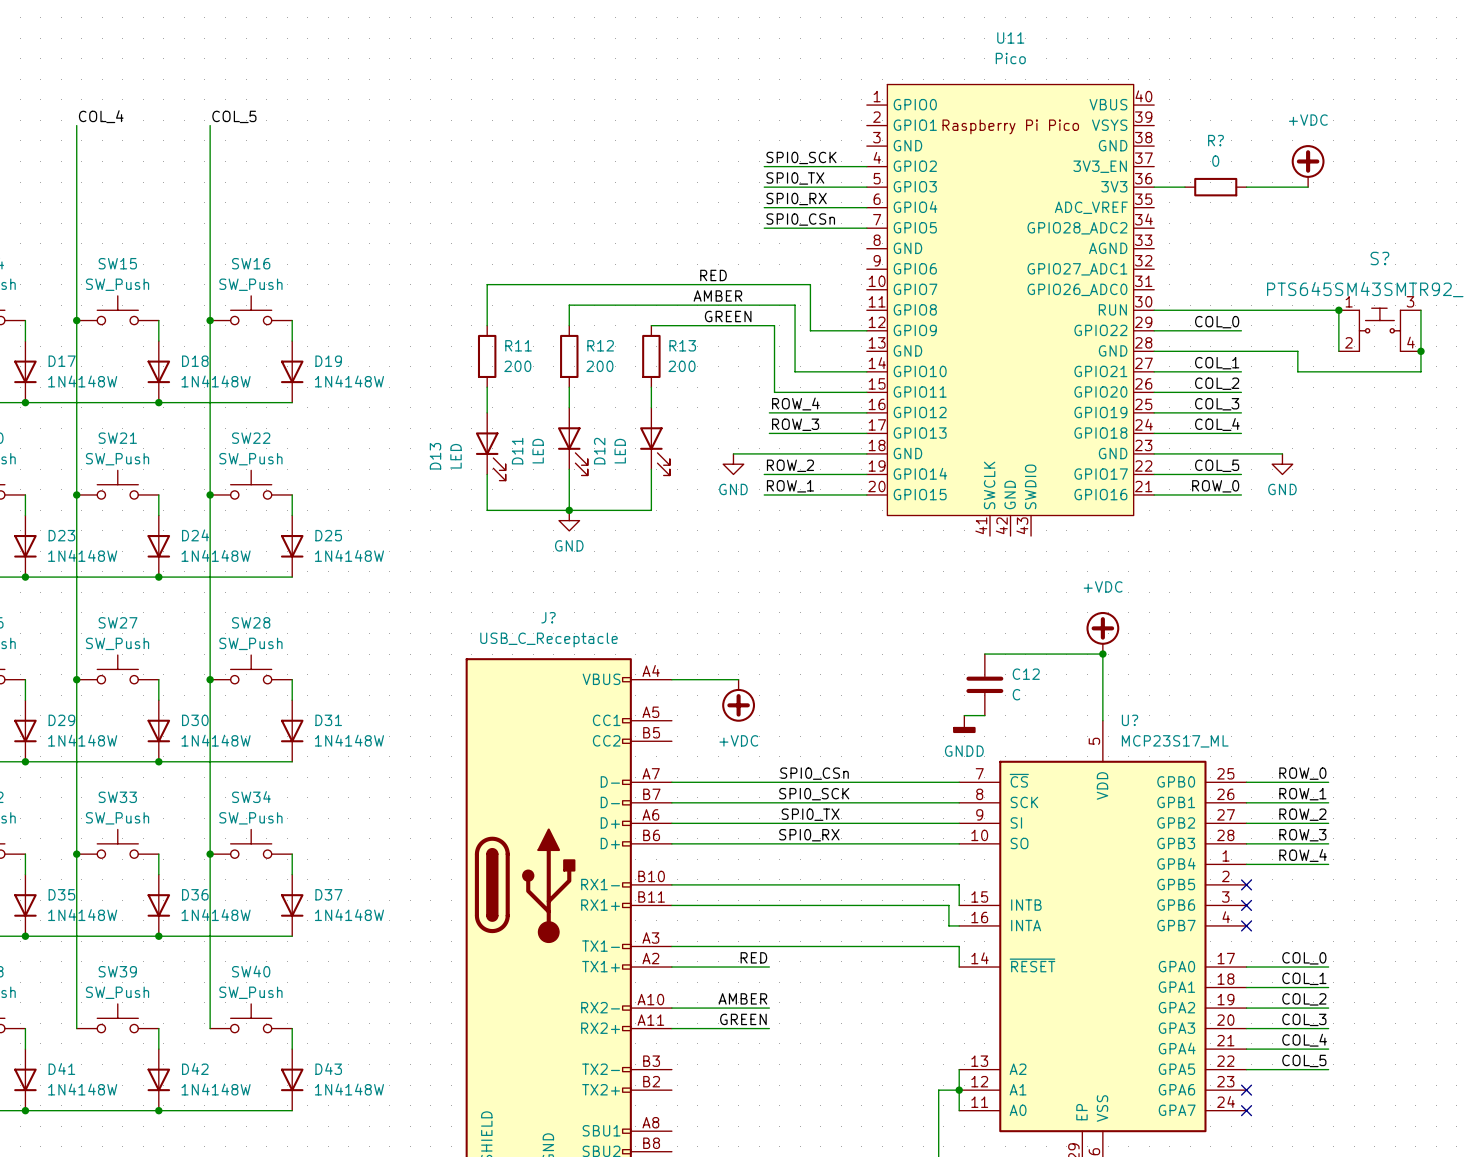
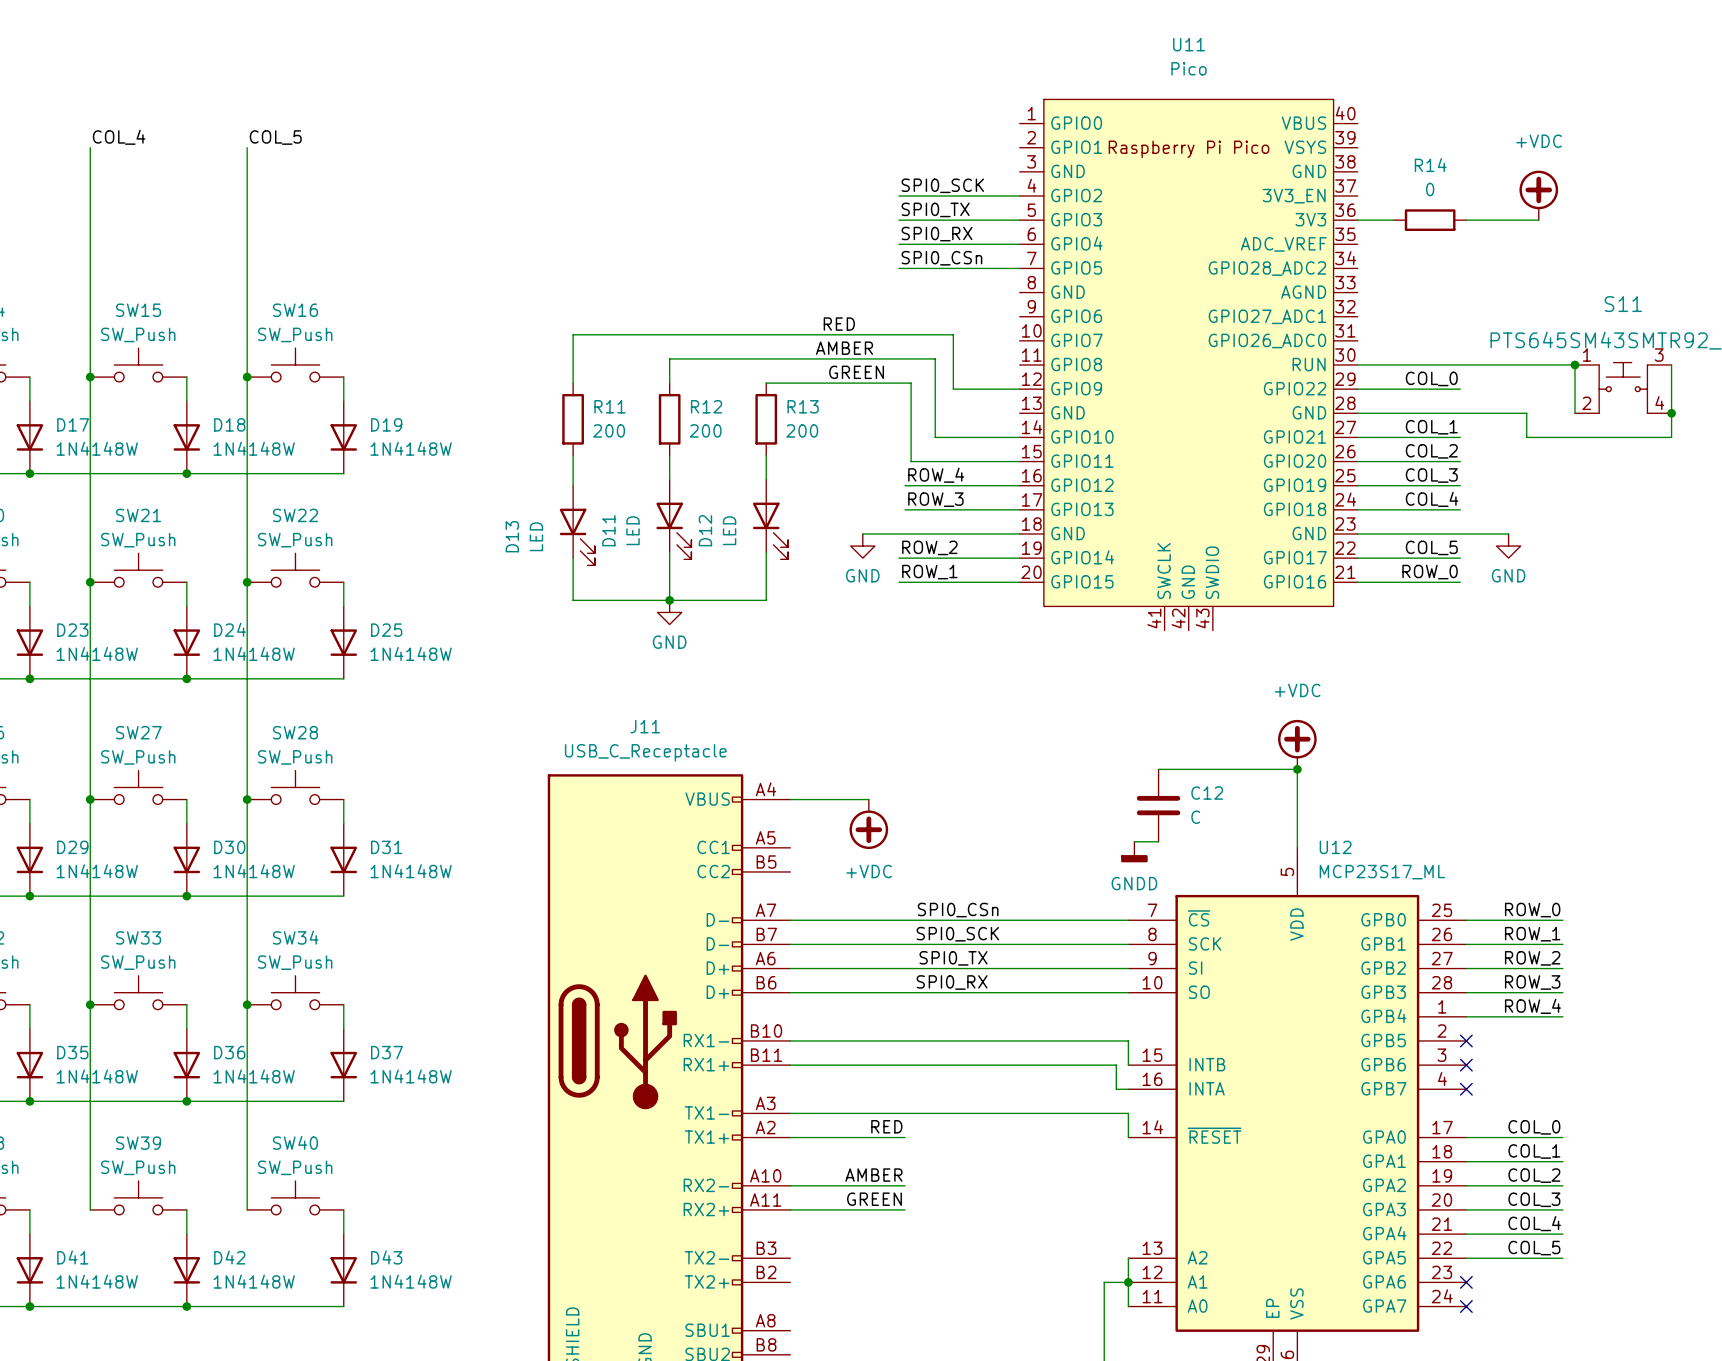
R? name: R? (1215, 140) -> R14 (1430, 165)
S? name: S? (1379, 258) -> S11 (1623, 304)
J? name: J? (548, 617) -> J11 (645, 726)
U? name: U? (1130, 720) -> U12 (1335, 847)

